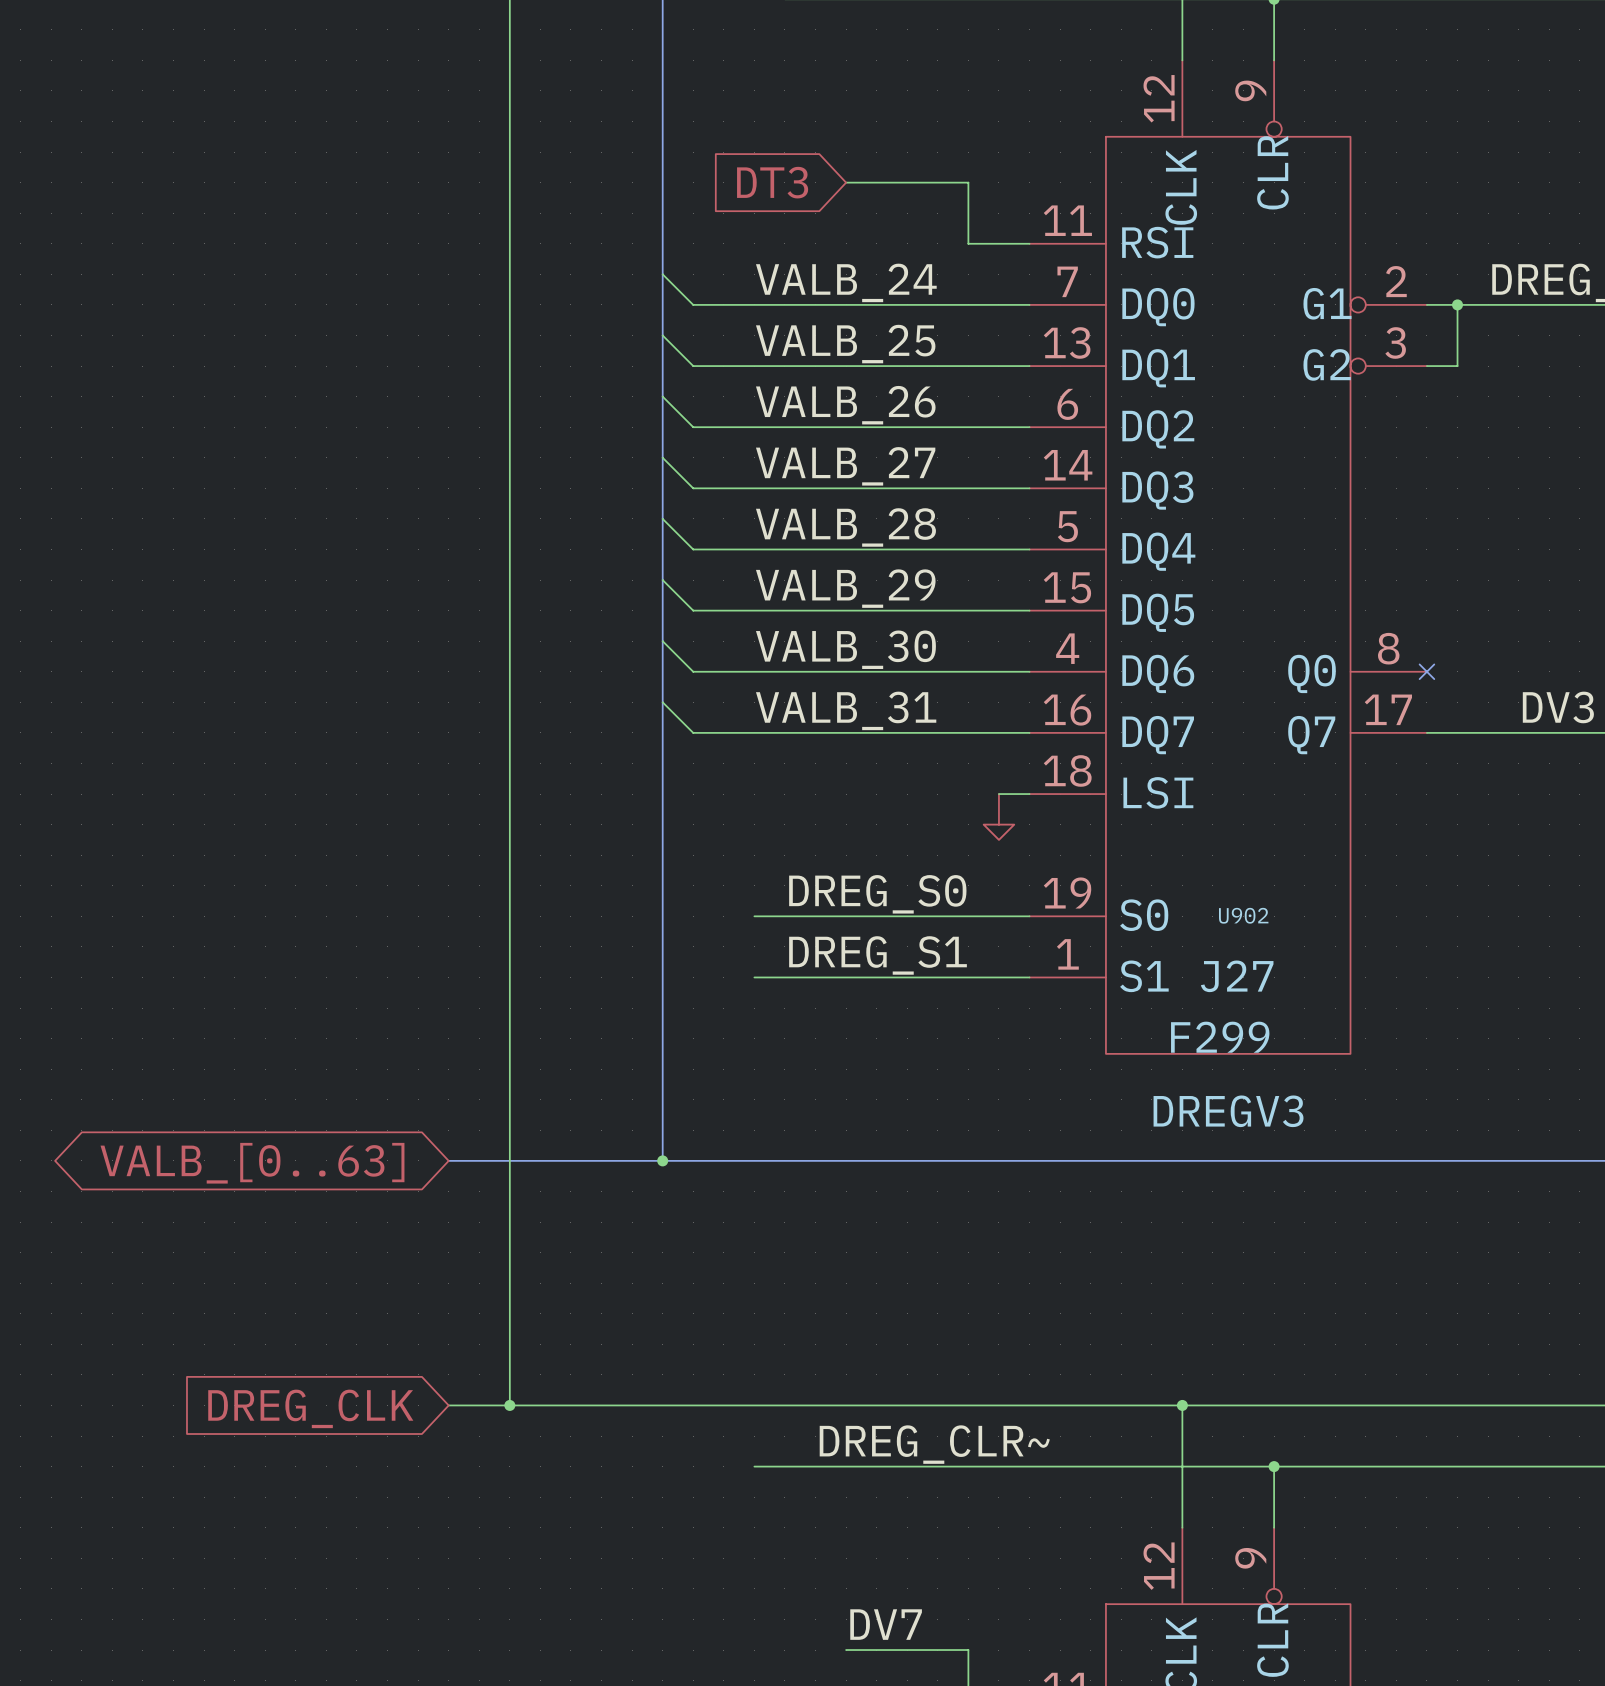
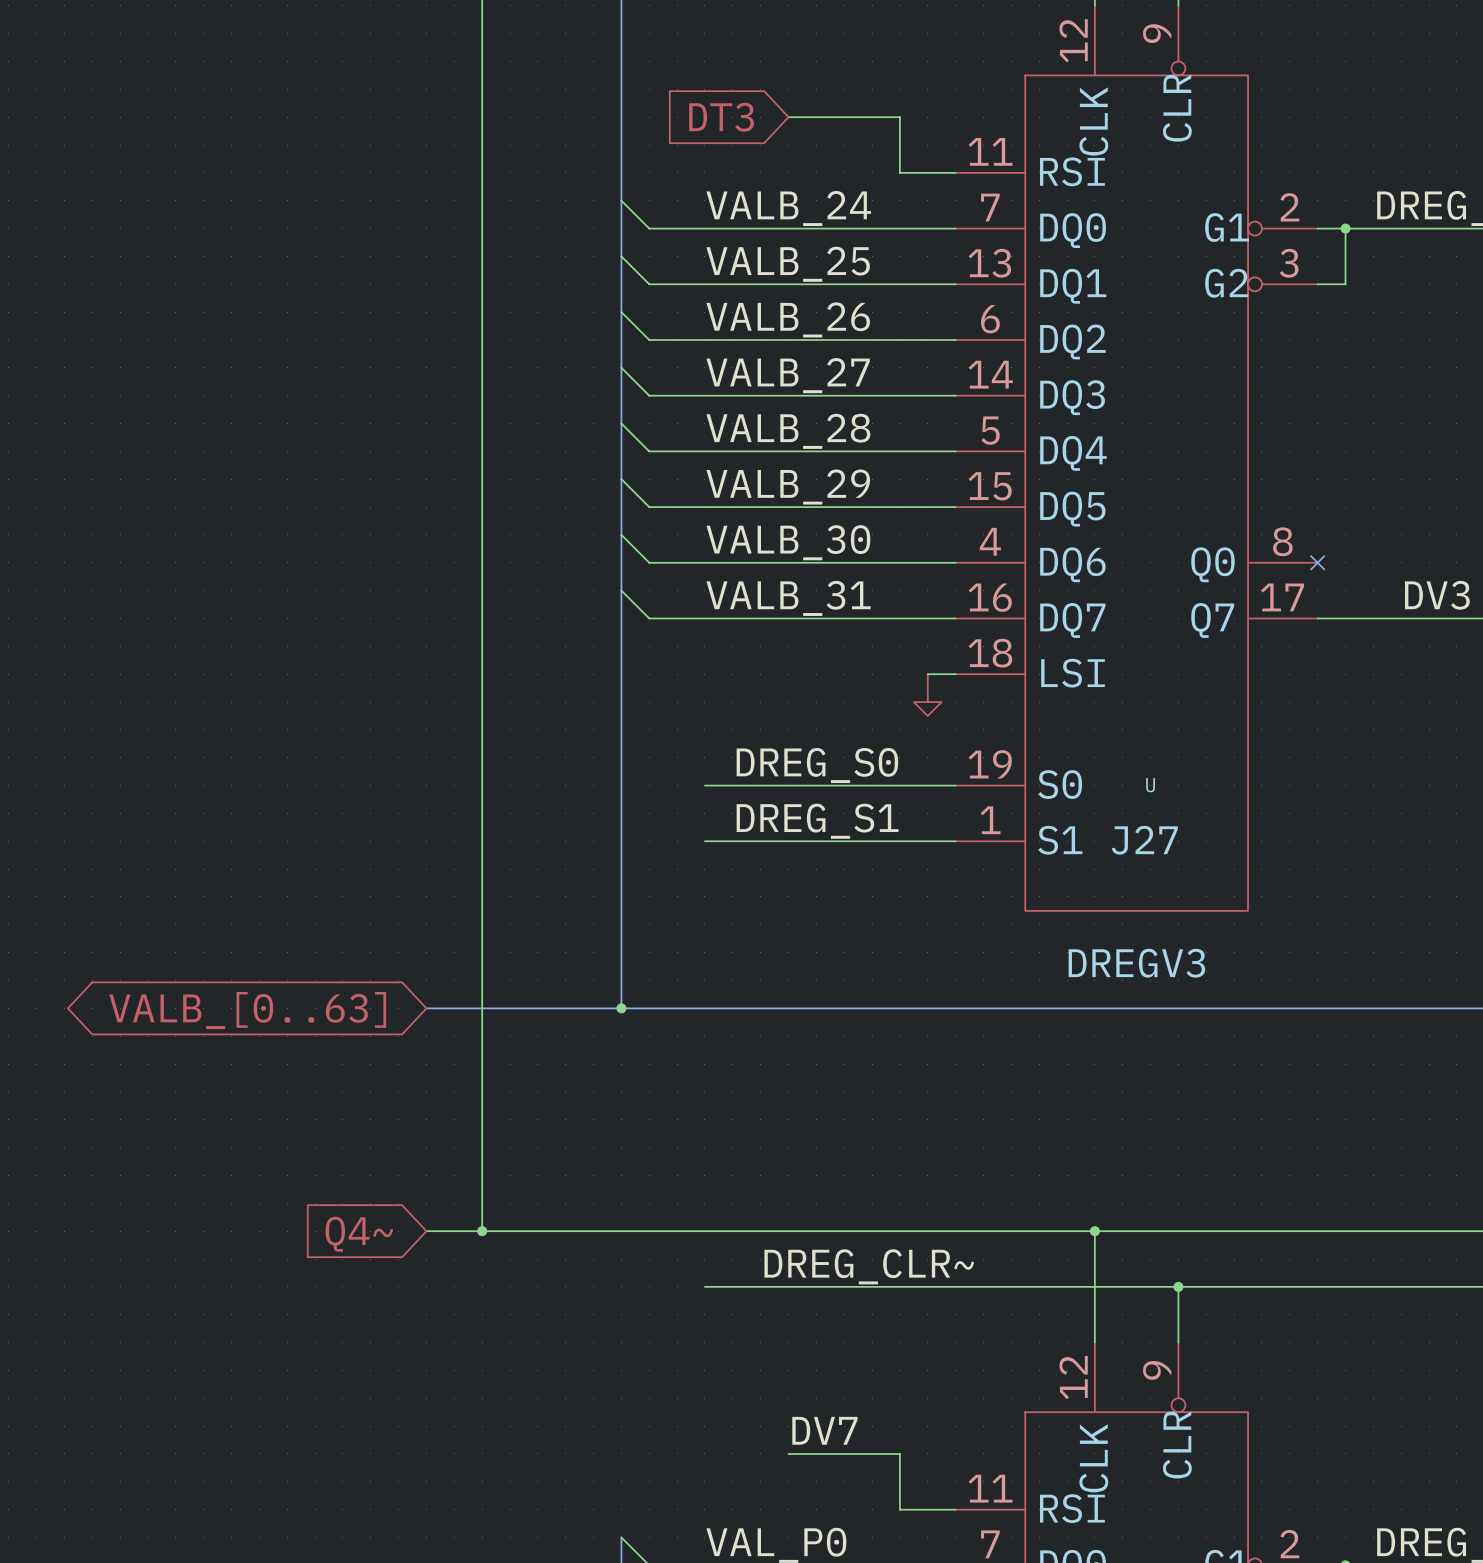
U902 name: U902 (1243, 915) -> U (1150, 785)
U902 value: F299 (1220, 1037) -> none
global label: DREG_CLK (310, 1408) -> Q4~ (359, 1234)

